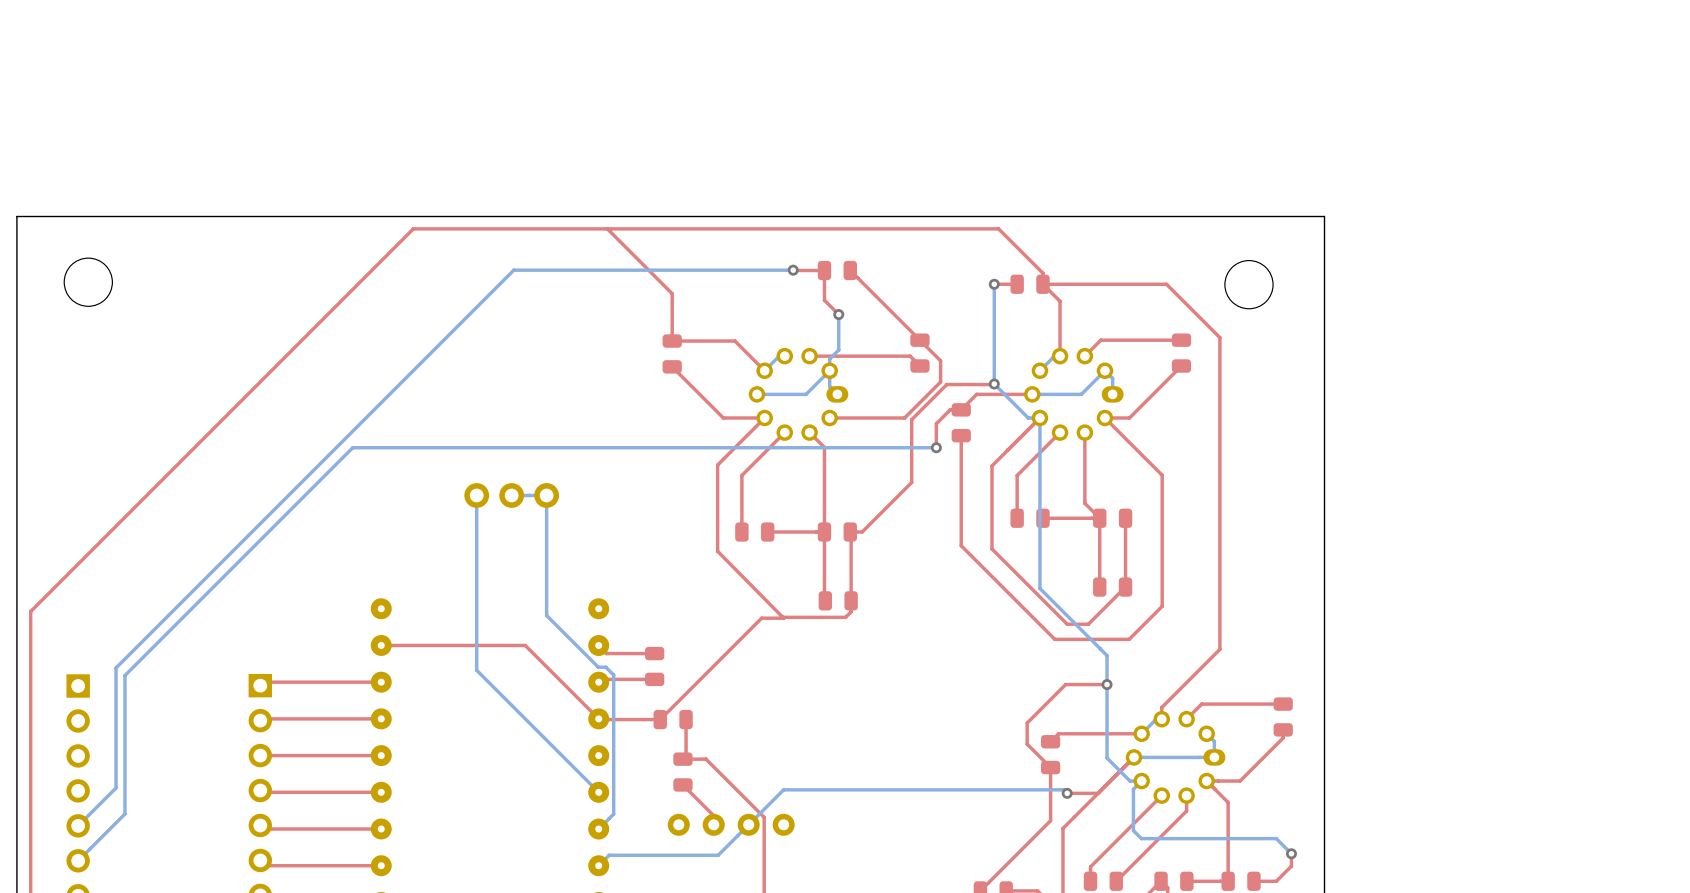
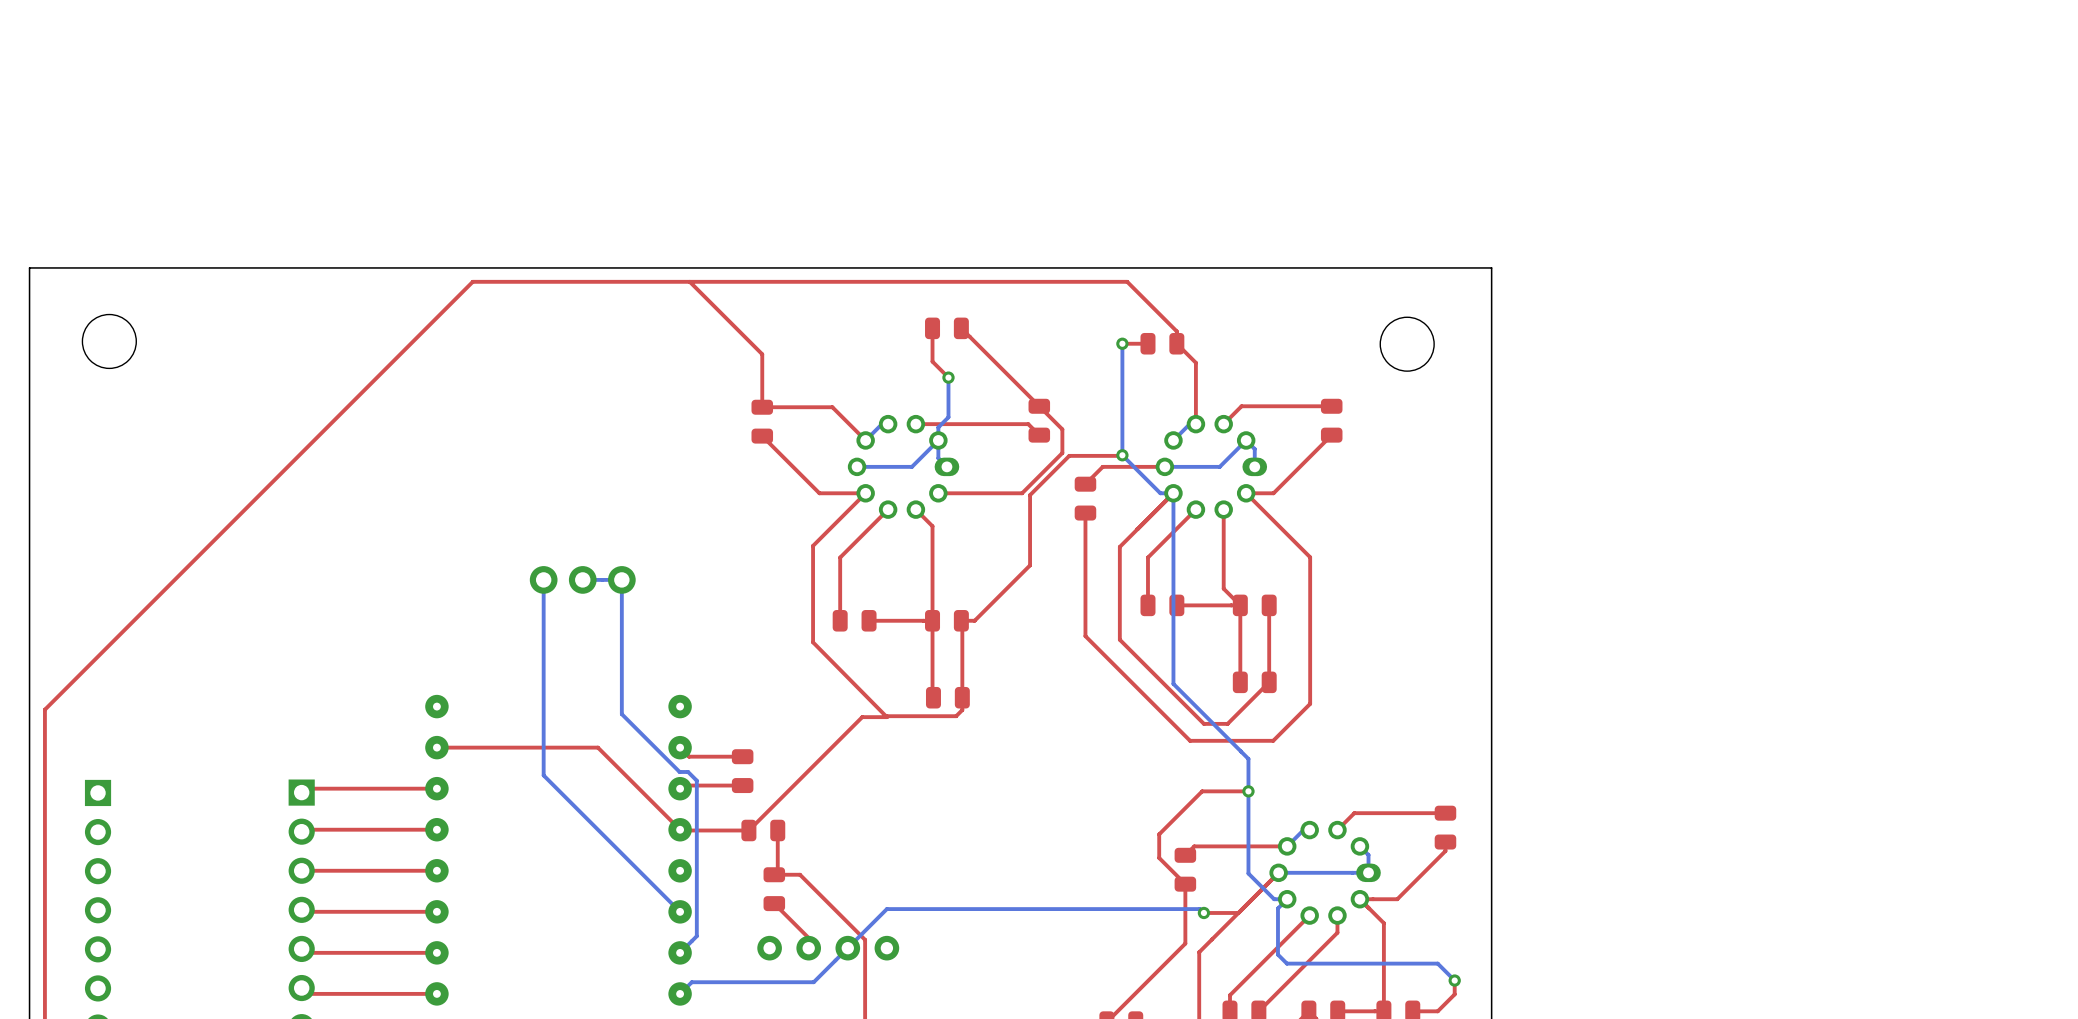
top track: (793, 270) (824, 270) -> none
bottom track: (793, 270) (513, 270) (116, 667) (116, 787) (78, 825) -> none
via: (793, 270) -> none
top track: (1042, 284) (1166, 284) (1219, 337) (1219, 649) (1161, 707) (1161, 719) -> none
top track: (961, 409) (950, 409) (936, 423) (936, 447) -> none
bottom track: (936, 447) (352, 447) (124, 675) (124, 814) (78, 860) -> none
via: (936, 447) -> none

